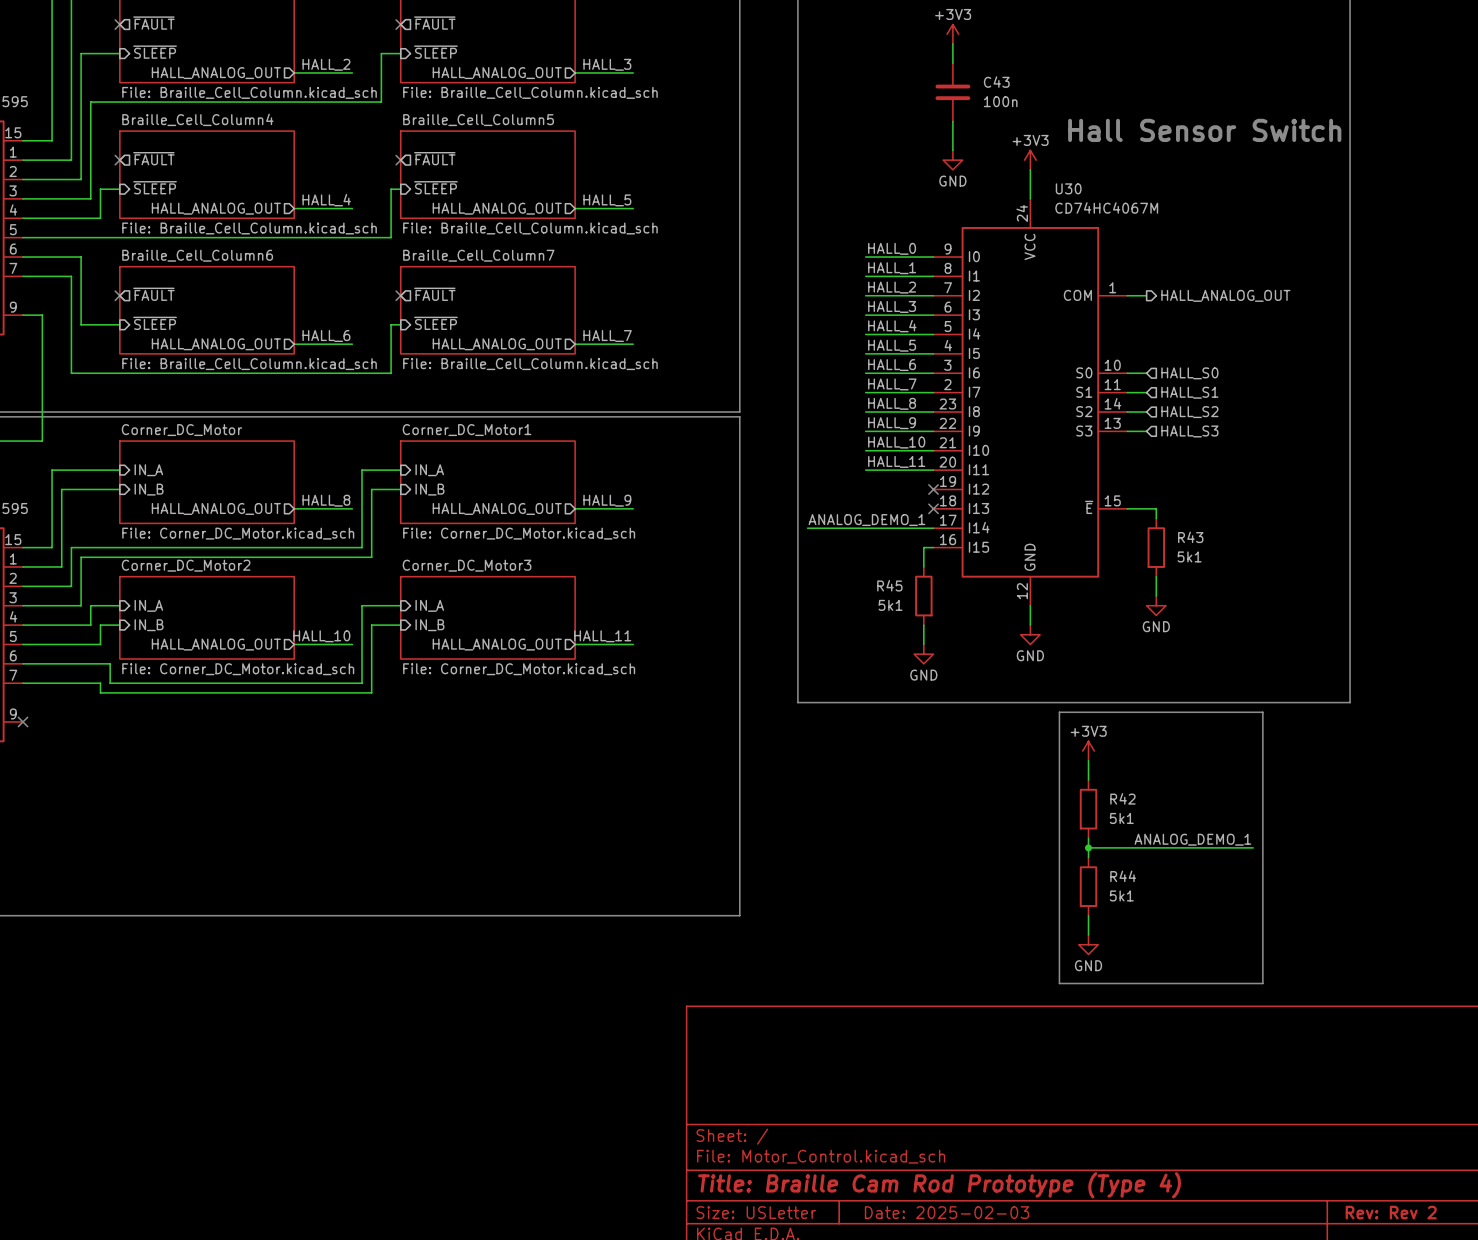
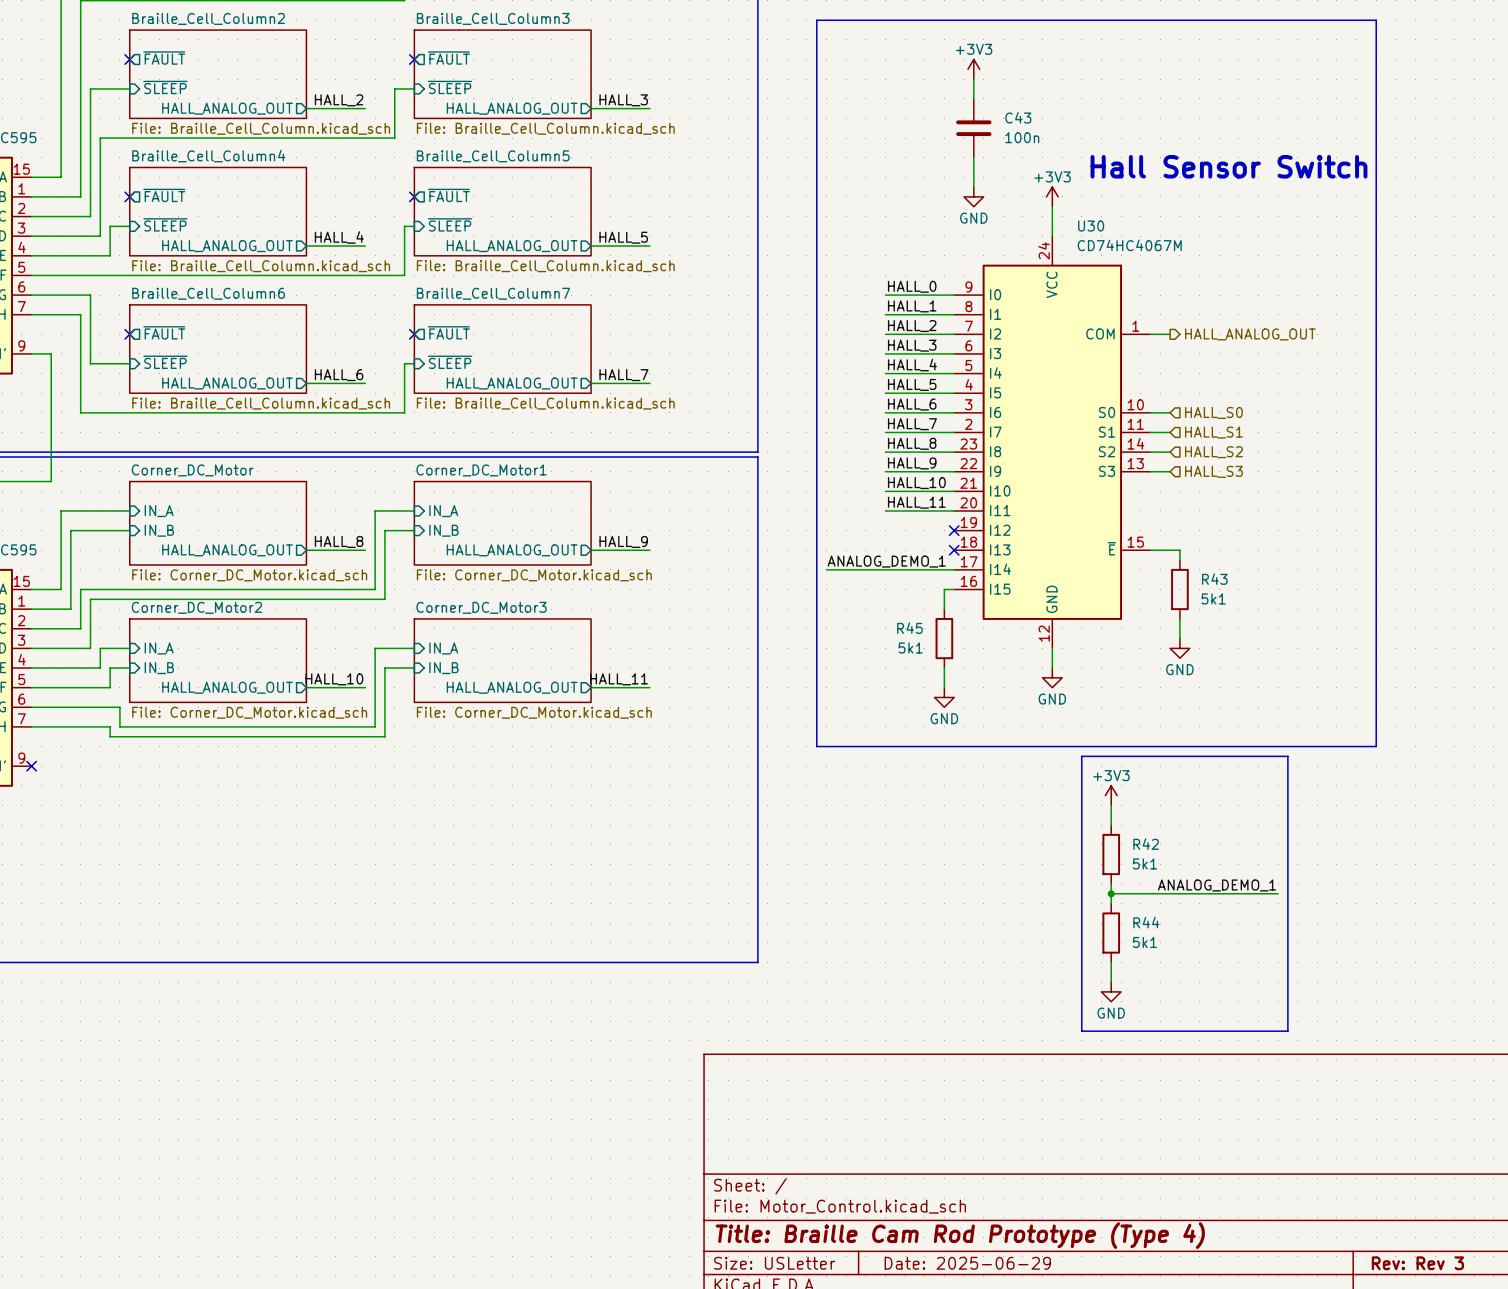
title block: Date: 2025-02-03 (946, 1212) -> Date: 2025-06-29 (967, 1263)
title block: Rev: Rev 2 (1391, 1212) -> Rev: Rev 3 (1417, 1263)

